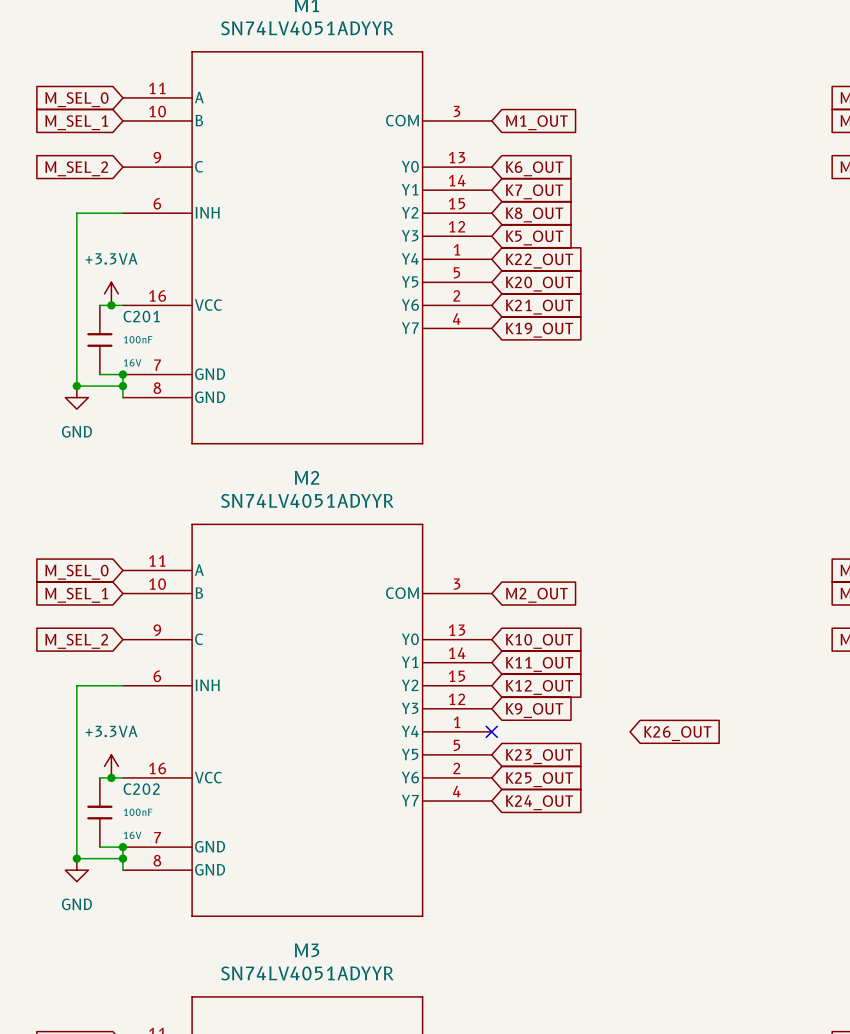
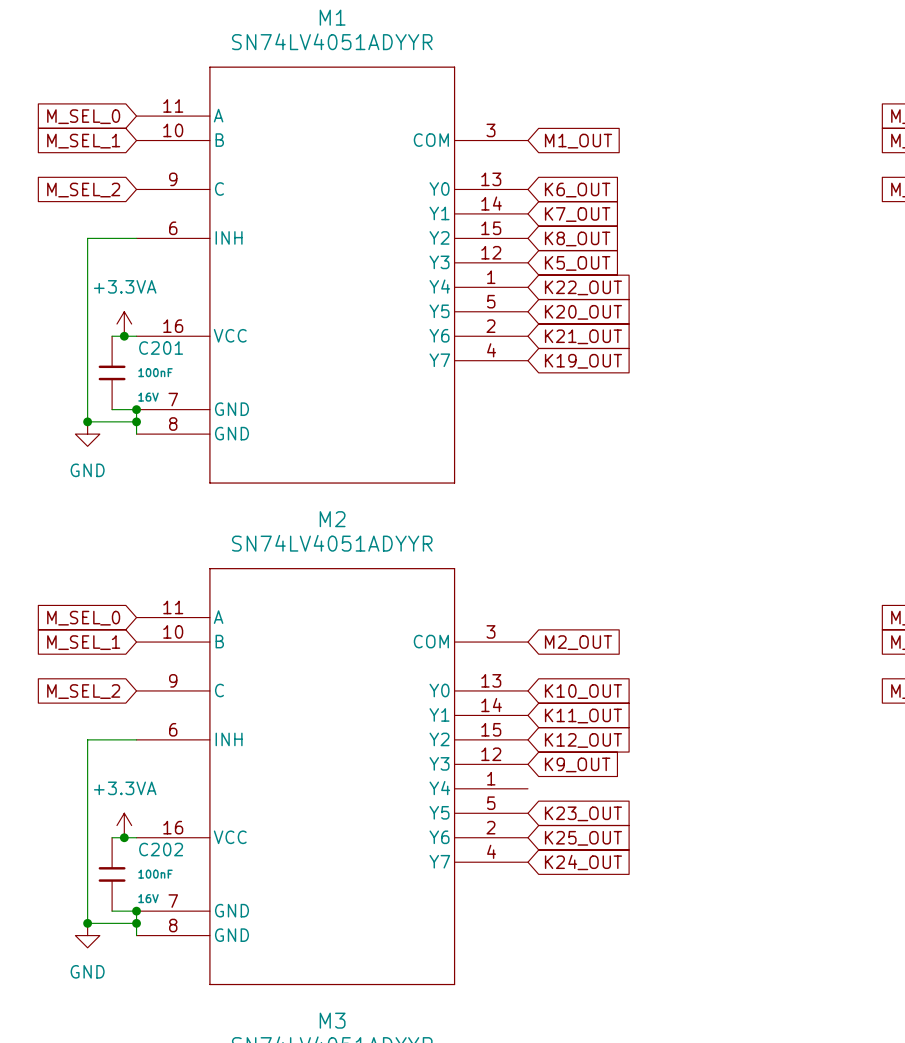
no-connect mark: (491, 731) -> none
global label: K26_OUT (677, 733) -> none

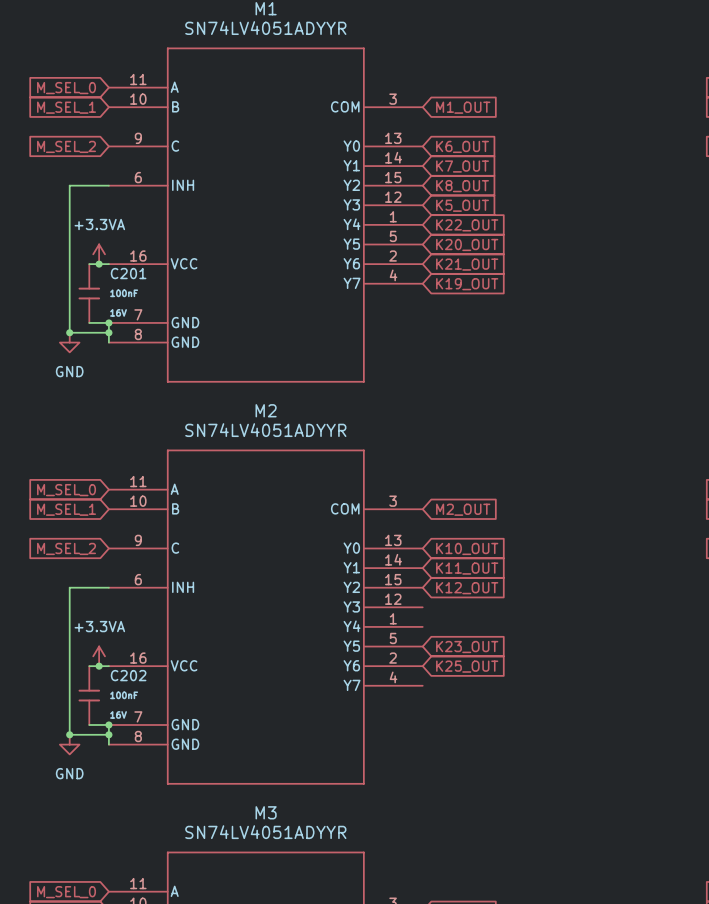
global label: K9_OUT (577, 764) -> none
global label: K24_OUT (583, 862) -> none

